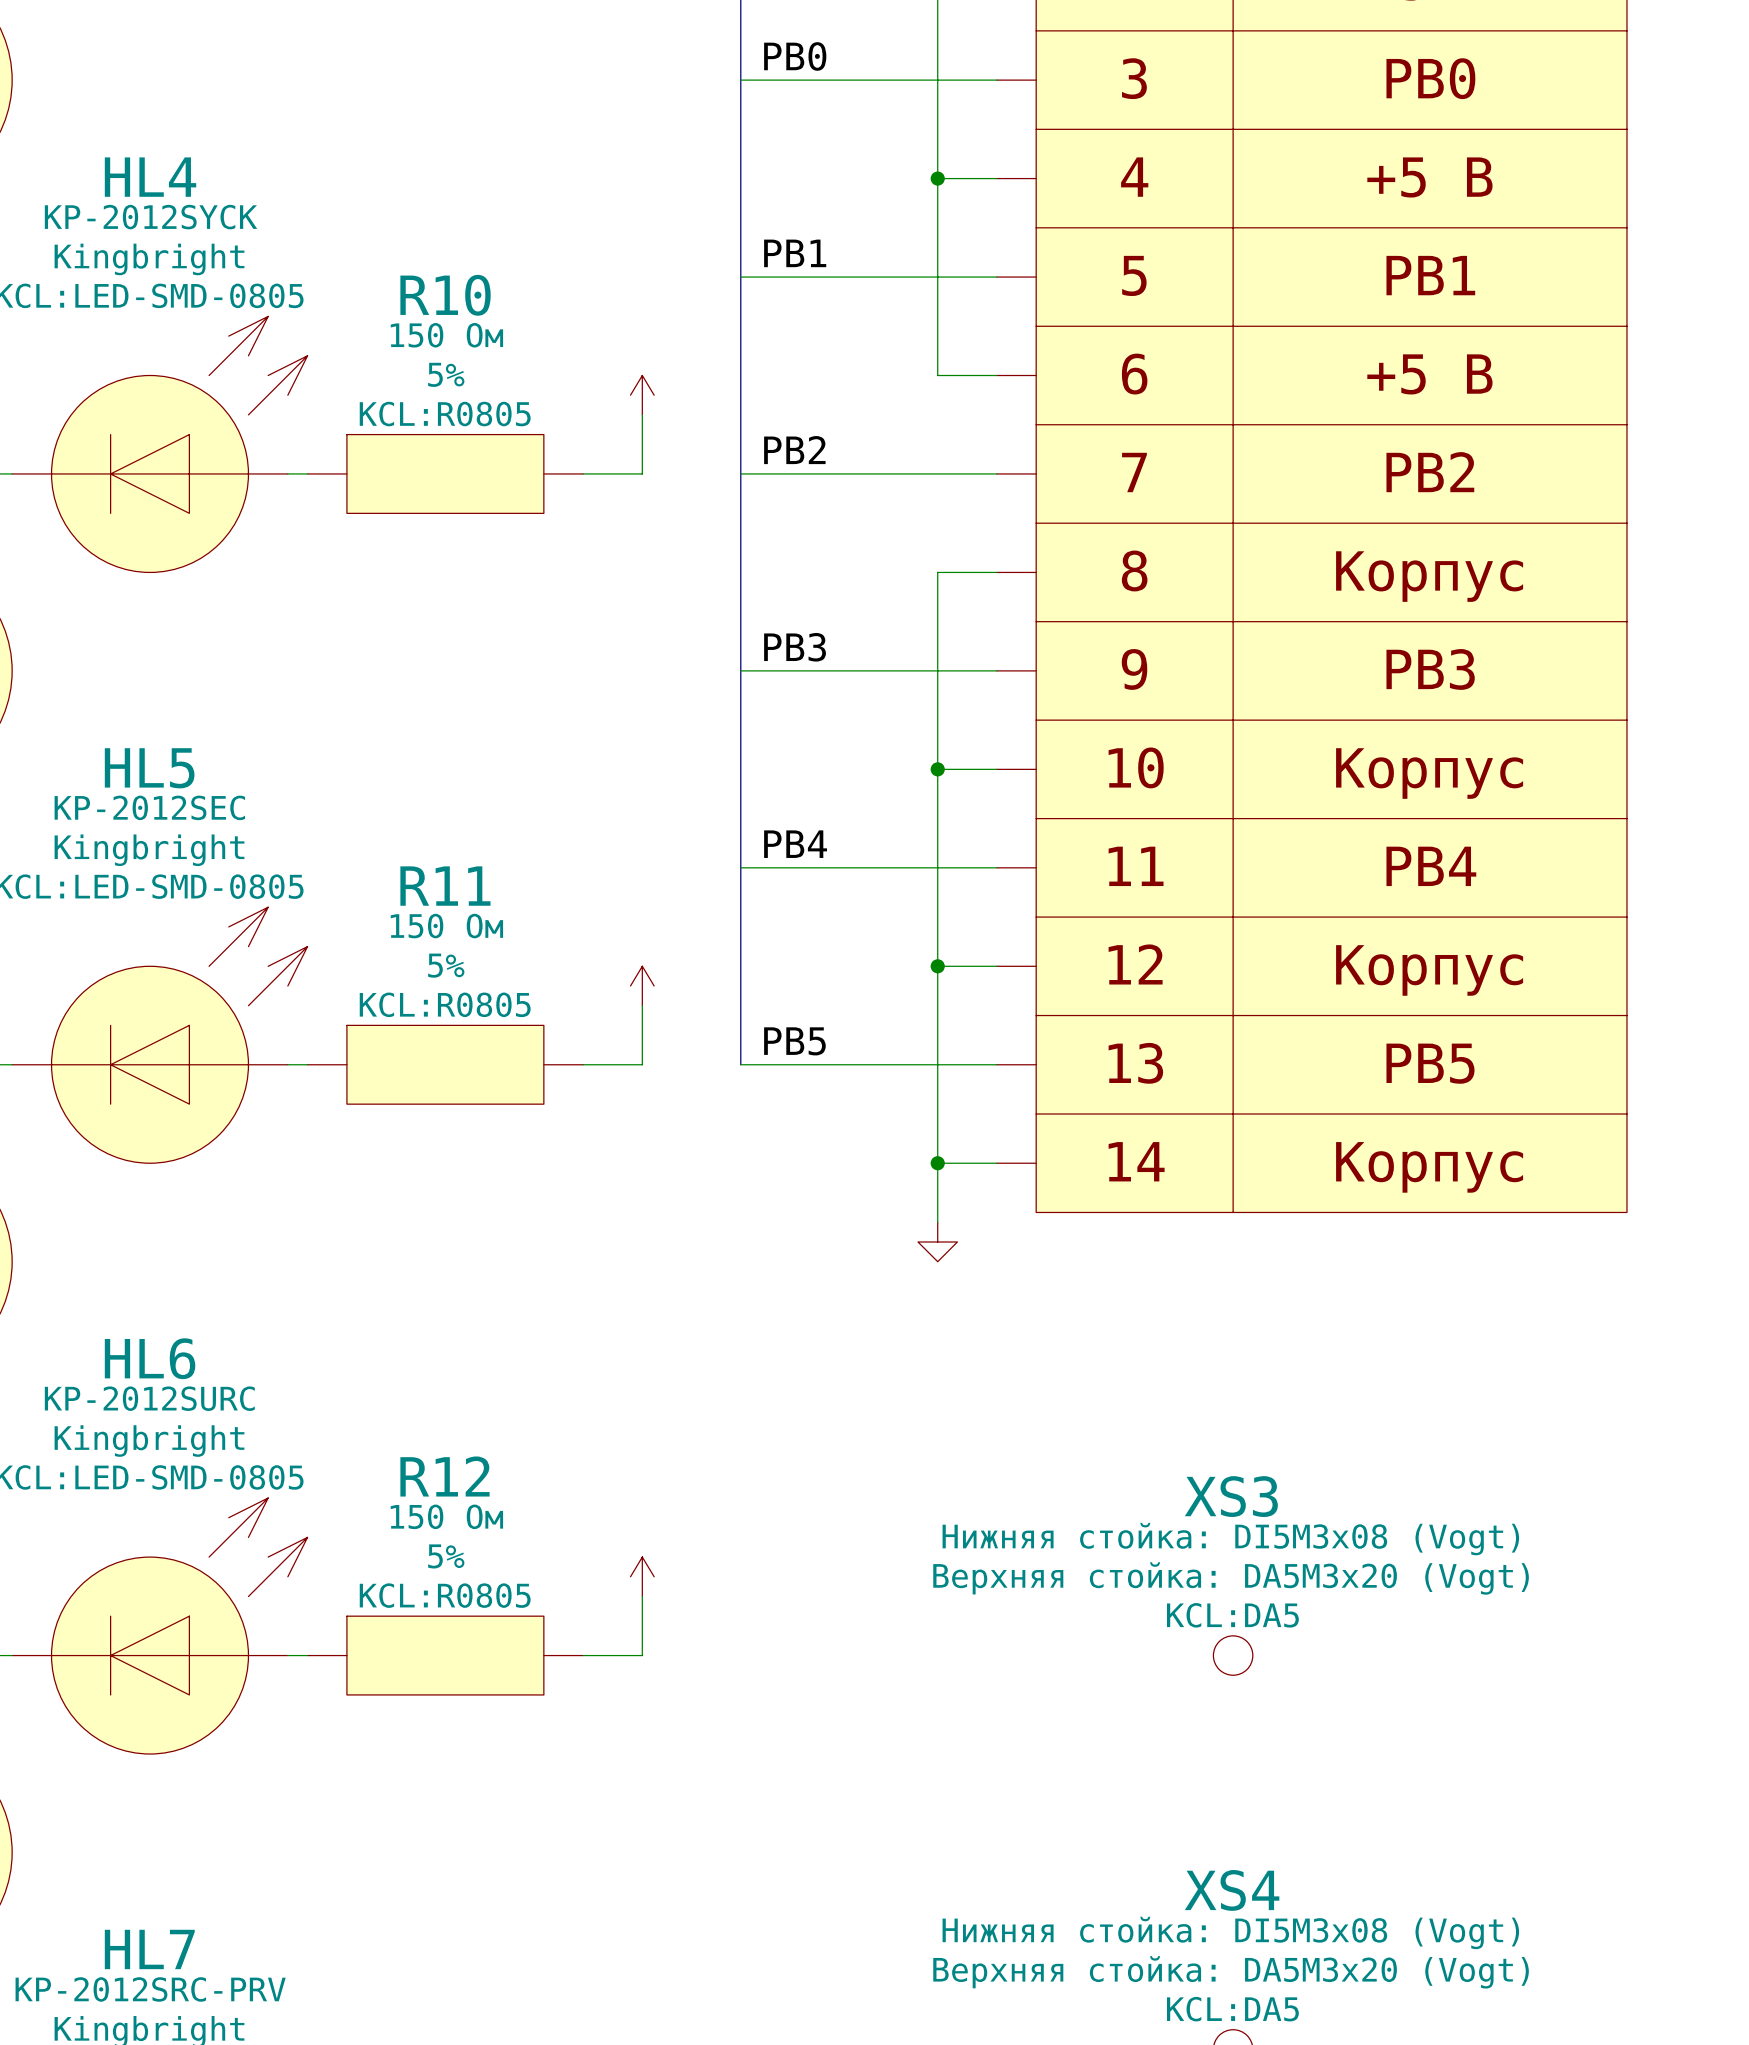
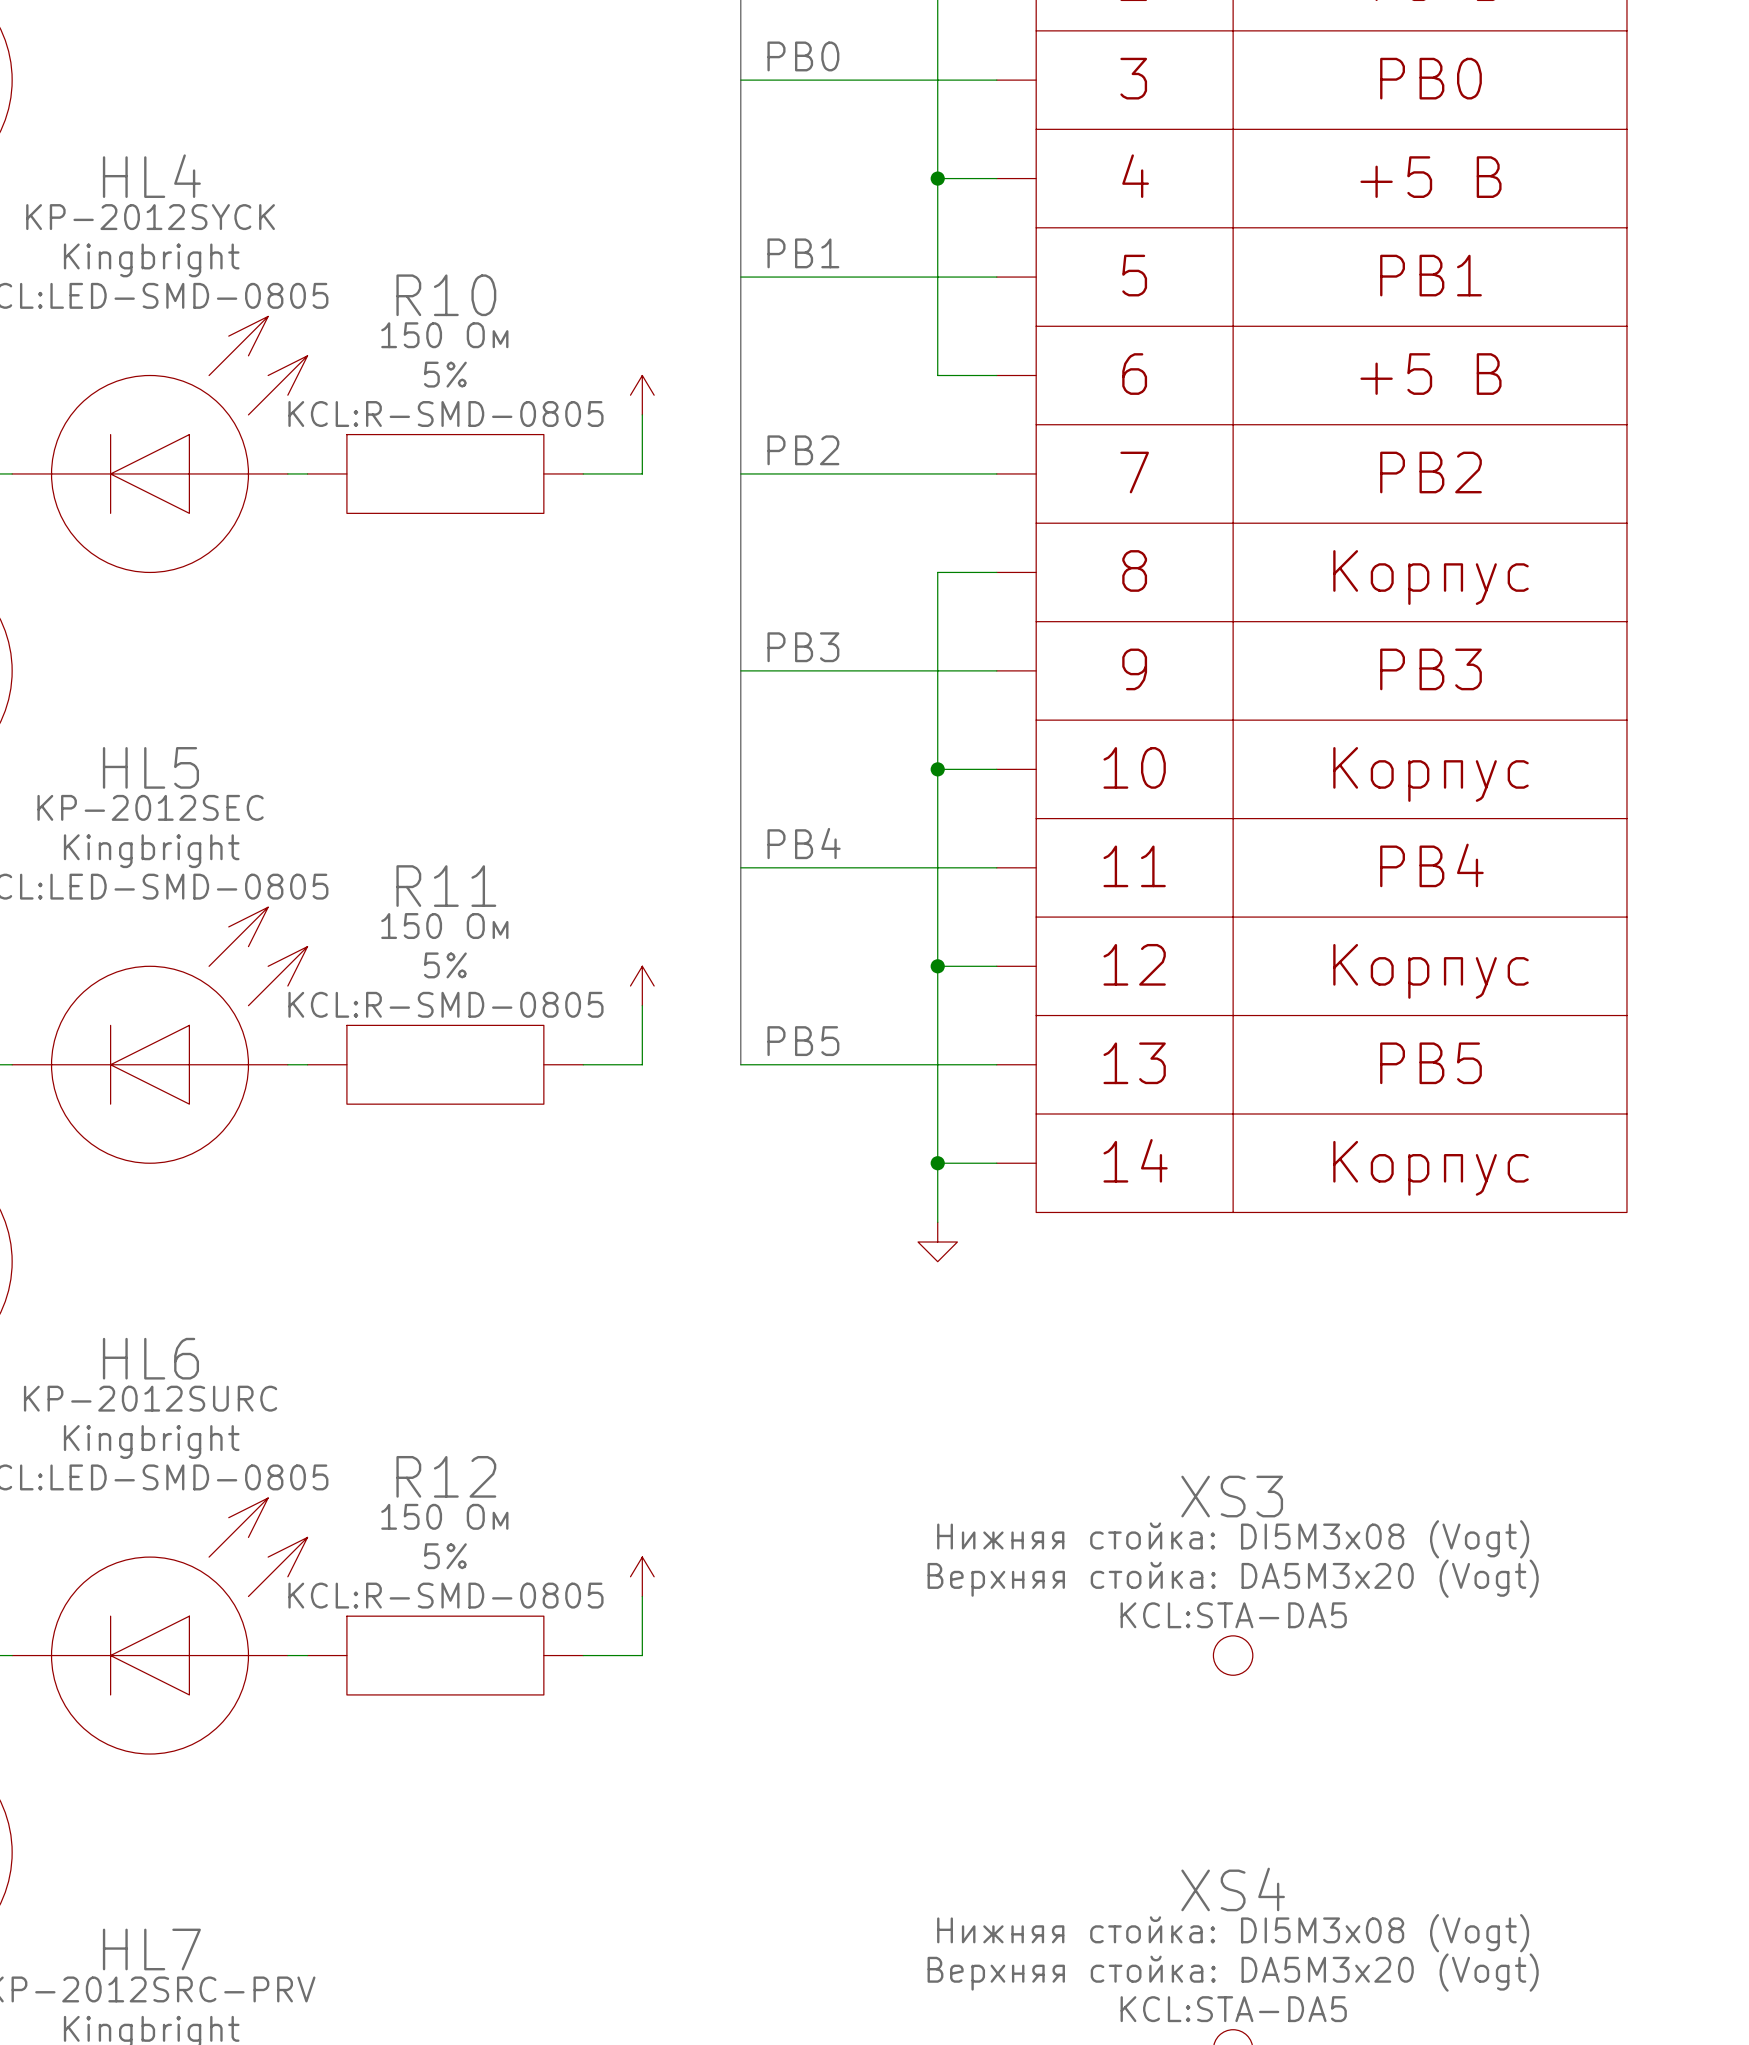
R10 text: KCL:R0805 (445, 414) -> KCL:R-SMD-0805 (445, 414)
R11 text: KCL:R0805 (445, 1004) -> KCL:R-SMD-0805 (445, 1004)
R12 text: KCL:R0805 (445, 1595) -> KCL:R-SMD-0805 (445, 1595)
XS3 text: KCL:DA5 (1232, 1615) -> KCL:STA-DA5 (1233, 1615)
XS4 text: KCL:DA5 (1232, 2009) -> KCL:STA-DA5 (1233, 2009)

